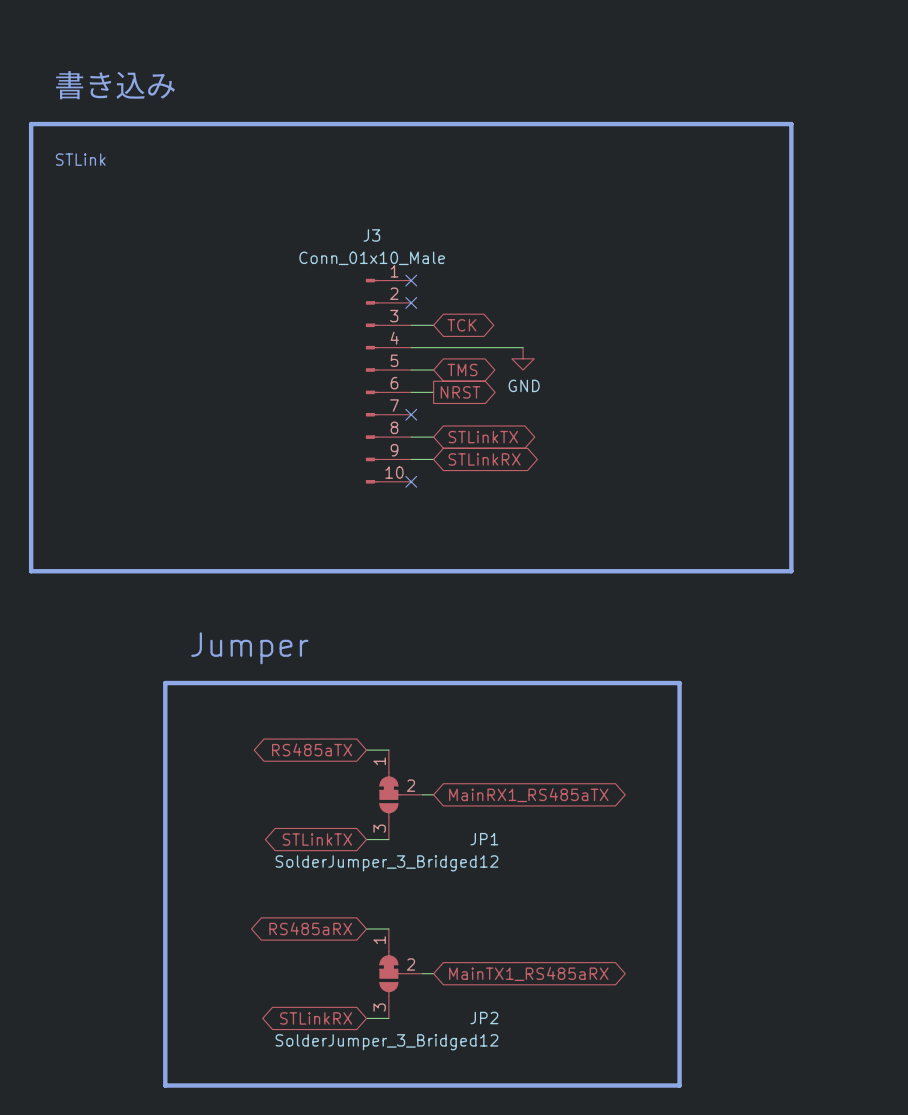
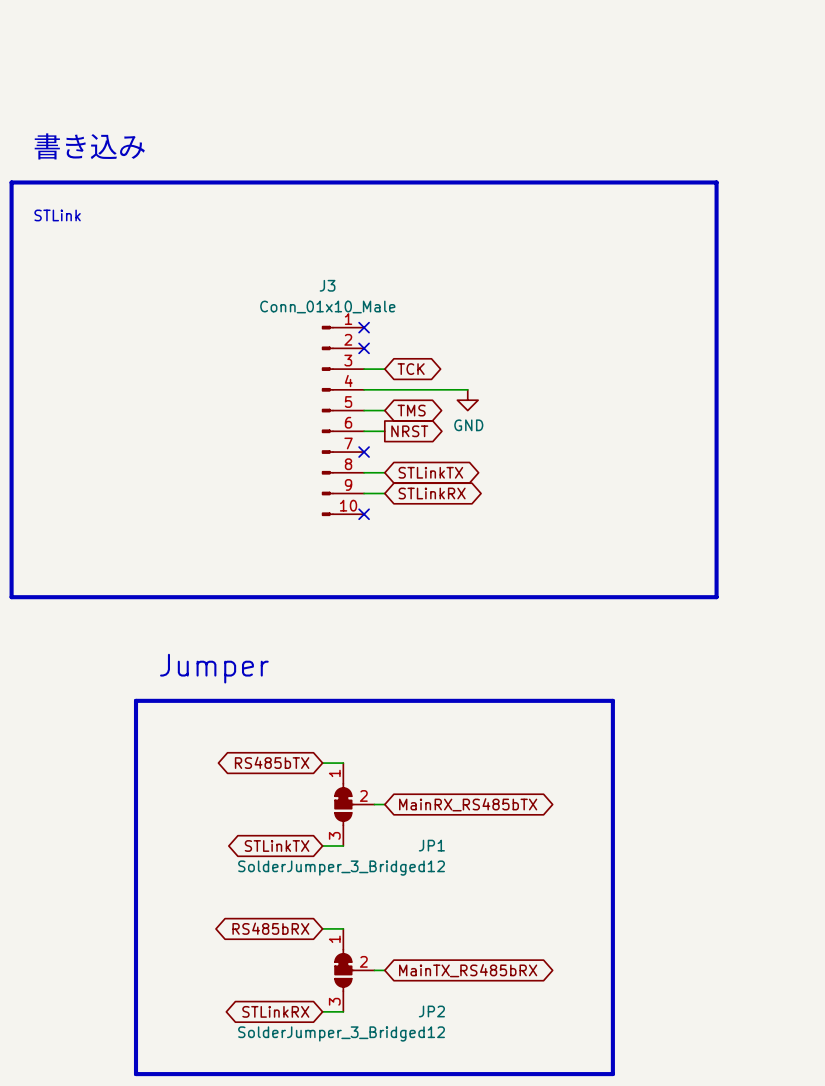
global label: RS485aTX (312, 749) -> RS485bTX (272, 762)
global label: MainRX1_RS485aTX (528, 795) -> MainRX_RS485bTX (468, 804)
global label: RS485aRX (310, 928) -> RS485bRX (270, 928)
global label: MainTX1_RS485aRX (528, 973) -> MainTX_RS485bRX (468, 970)

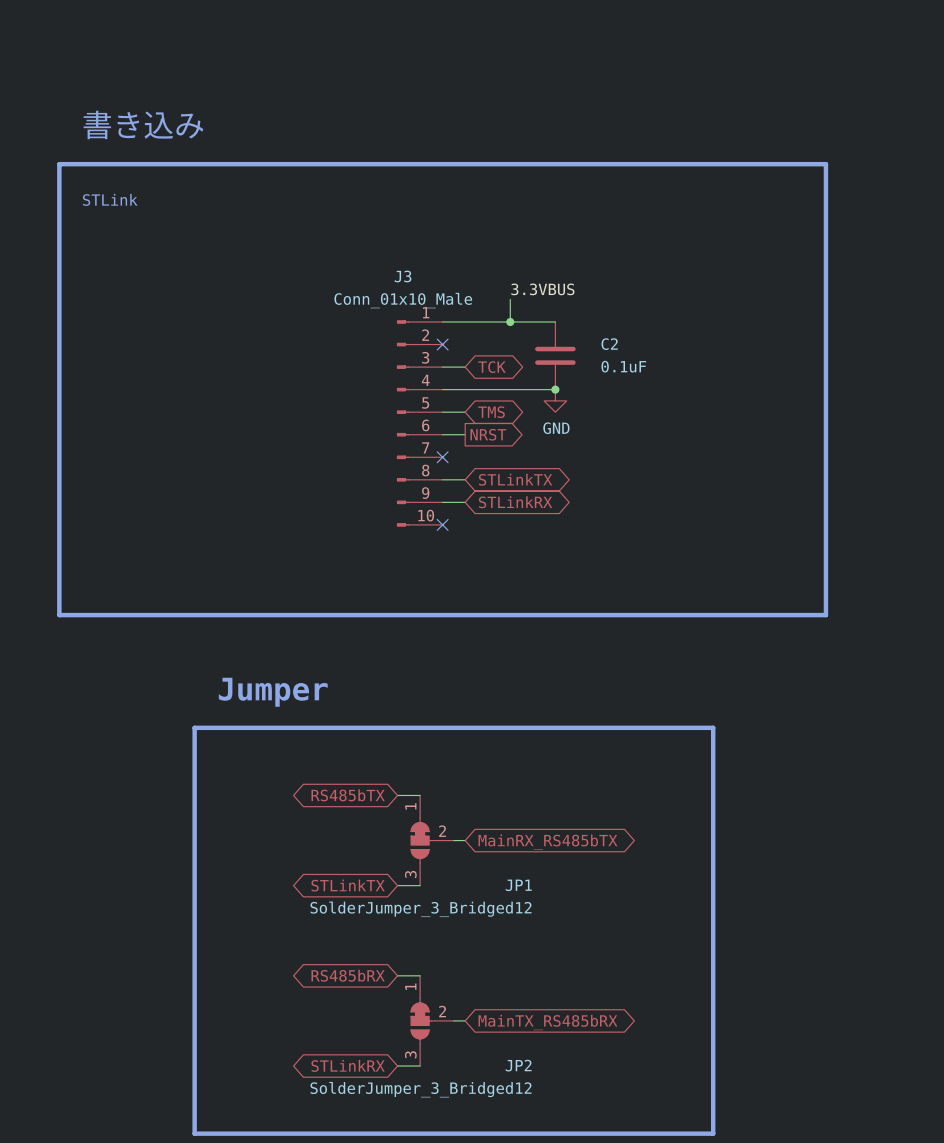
label: none -> 3.3VBUS (542, 289)
wire: none -> (510, 299) (510, 321)
wire: none -> (442, 321) (555, 321)
no-connect mark: (364, 327) -> none
junction: none -> (510, 321)
C2: none -> 0.1uF (555, 355)
junction: none -> (555, 389)

